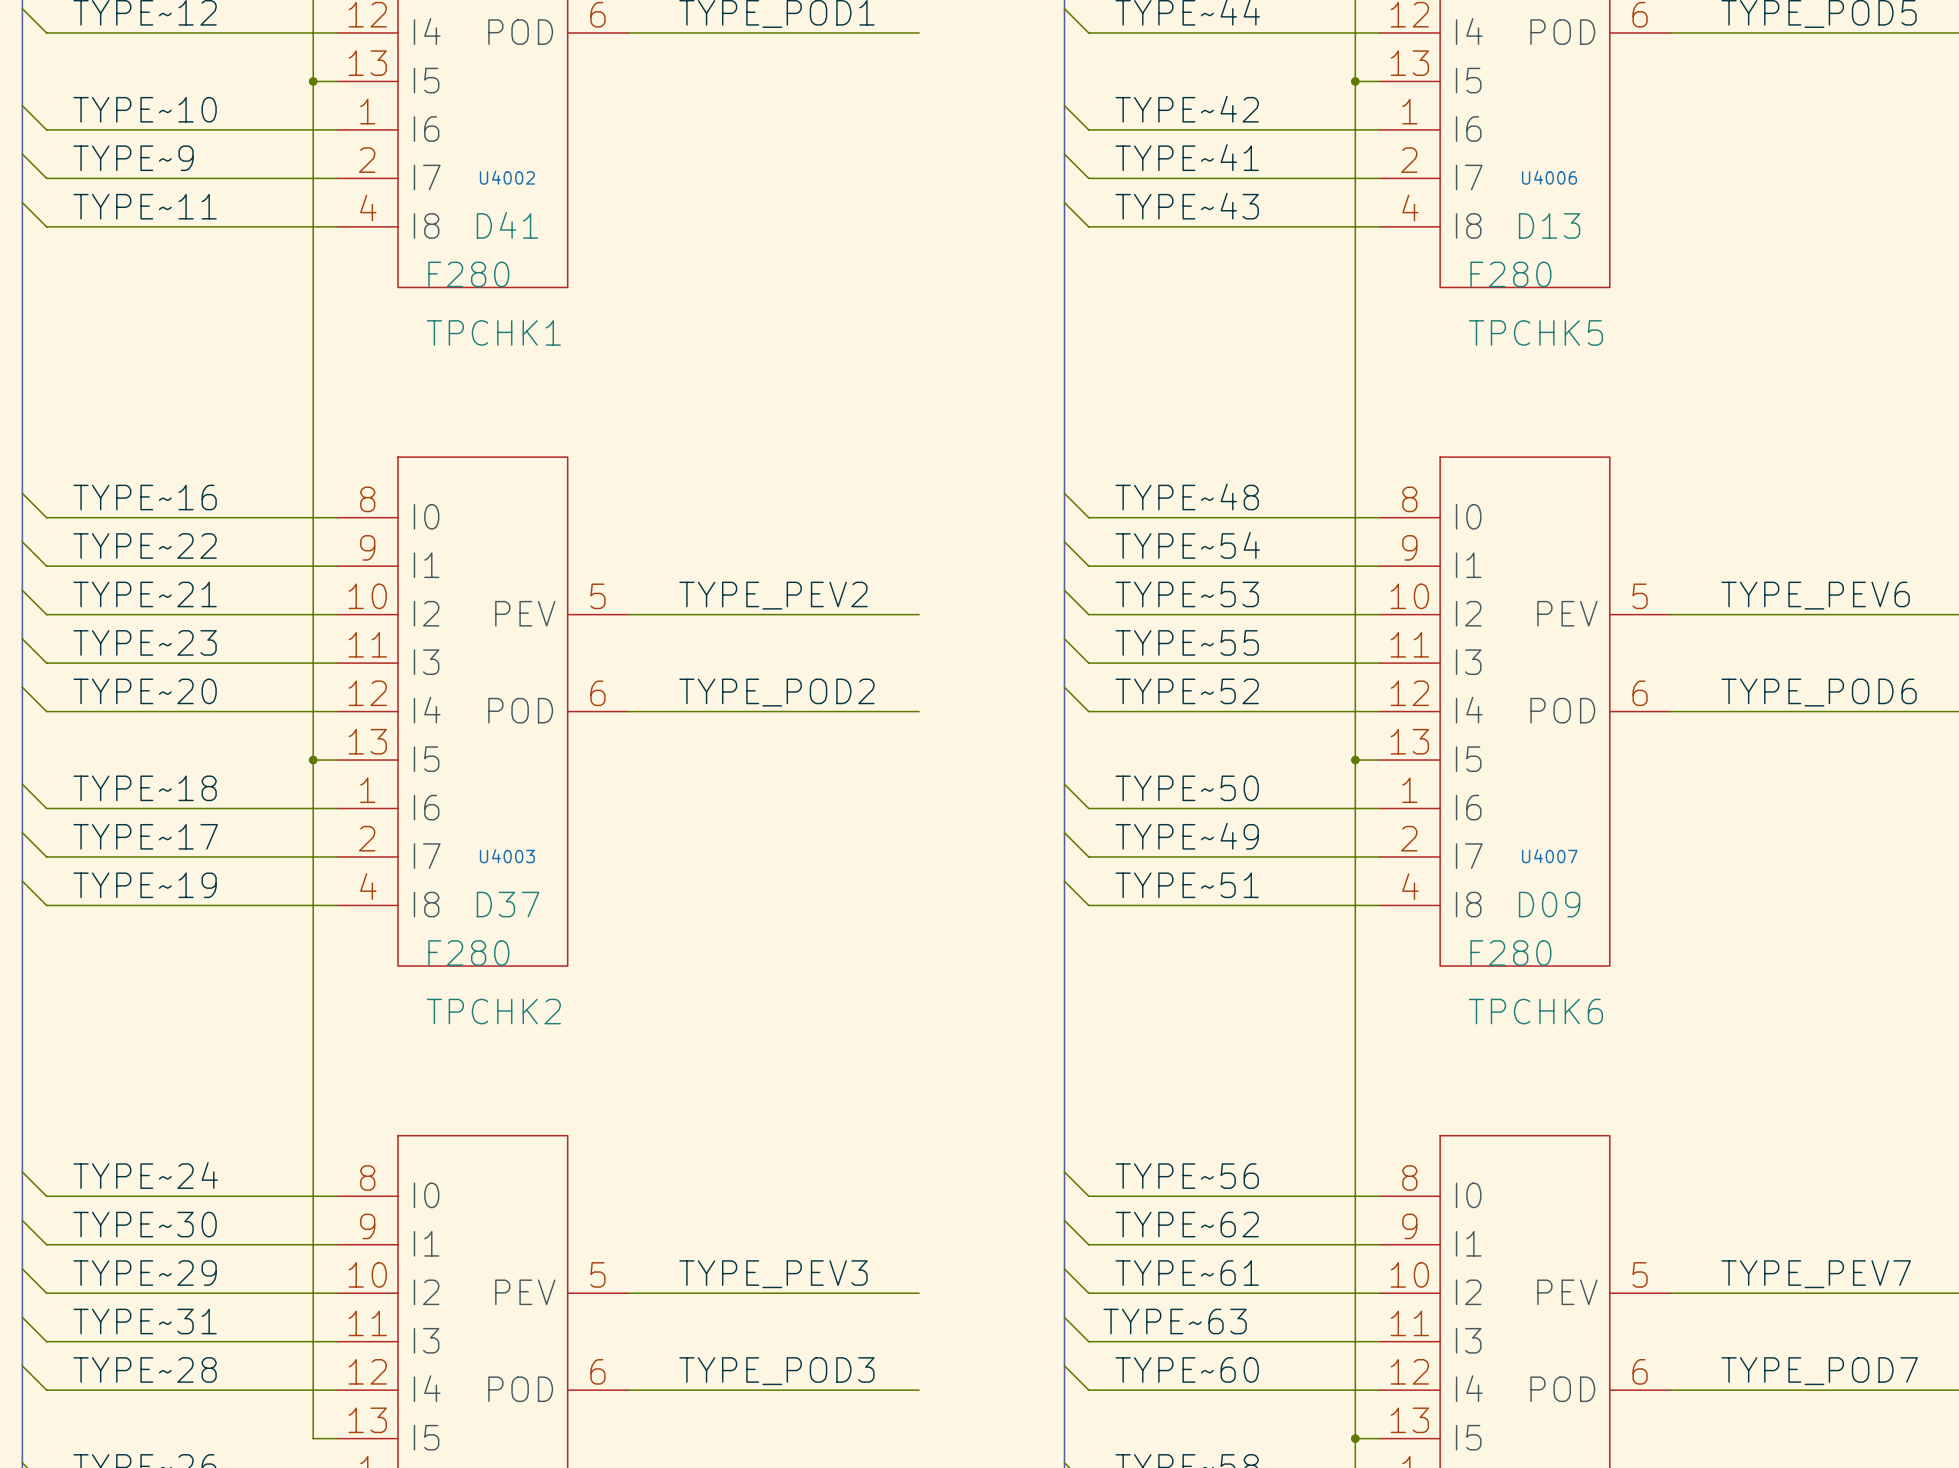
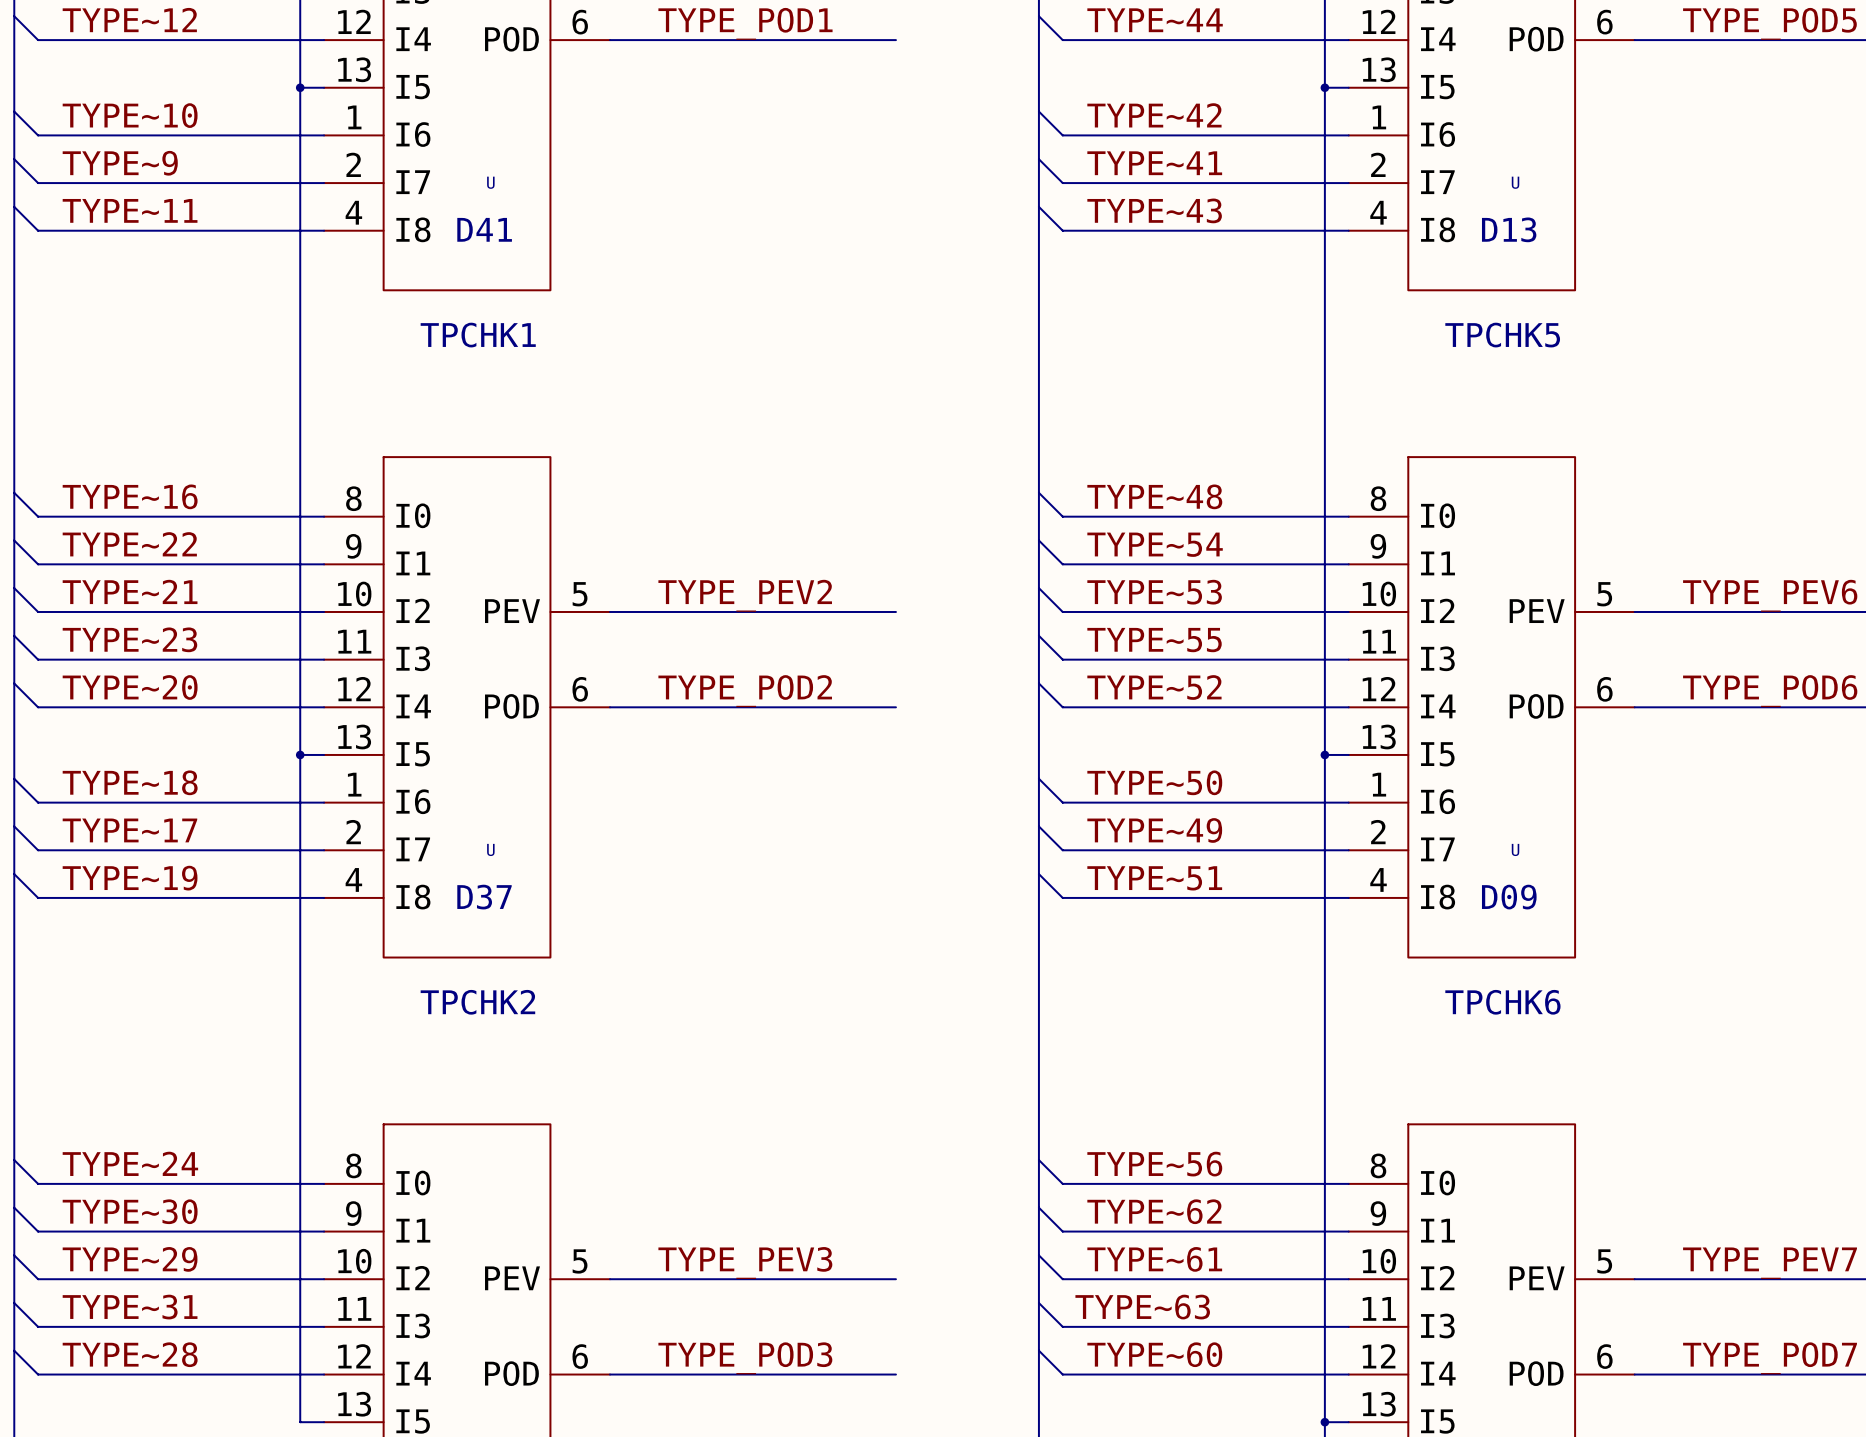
U4002 name: U4002 (507, 177) -> U (490, 182)
U4006 name: U4006 (1549, 177) -> U (1515, 182)
U4002 value: F280 (468, 274) -> none
U4006 value: F280 (1510, 274) -> none
U4003 name: U4003 (507, 856) -> U (490, 849)
U4007 name: U4007 (1549, 856) -> U (1515, 849)
U4003 value: F280 (468, 953) -> none
U4007 value: F280 (1510, 953) -> none

